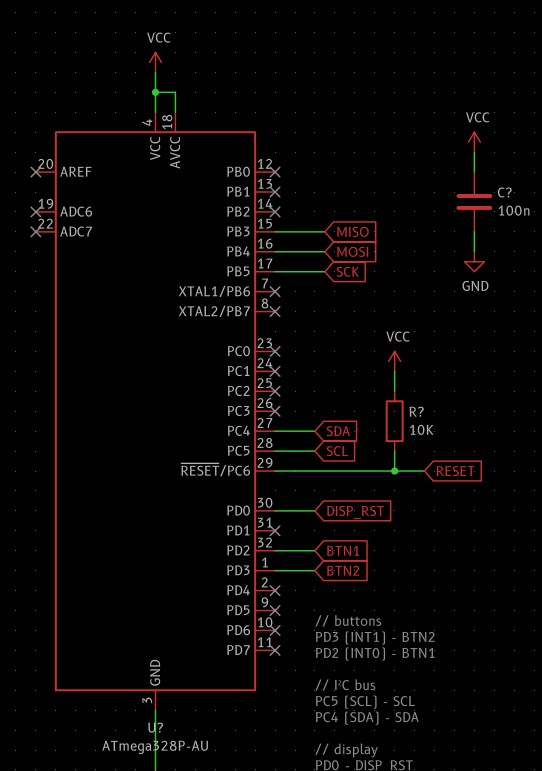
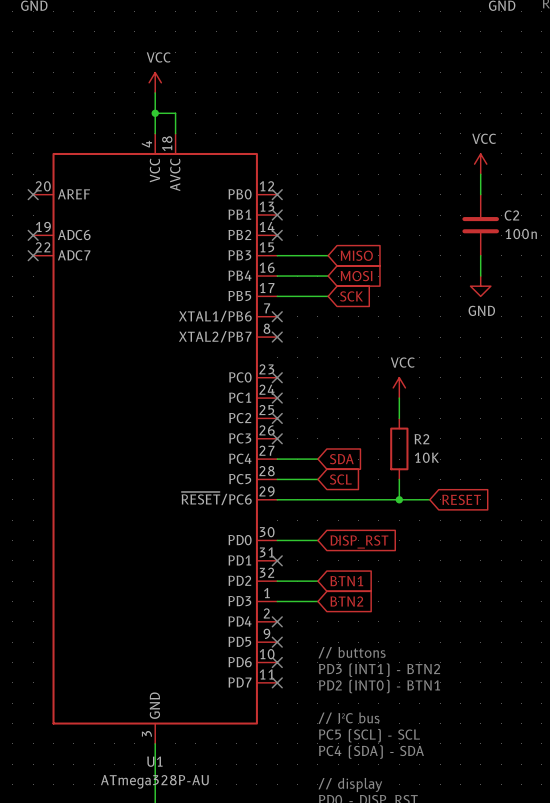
C? name: C? (504, 192) -> C2 (511, 215)
R? name: R? (416, 411) -> R2 (421, 439)
U? name: U? (155, 727) -> U1 (154, 761)

